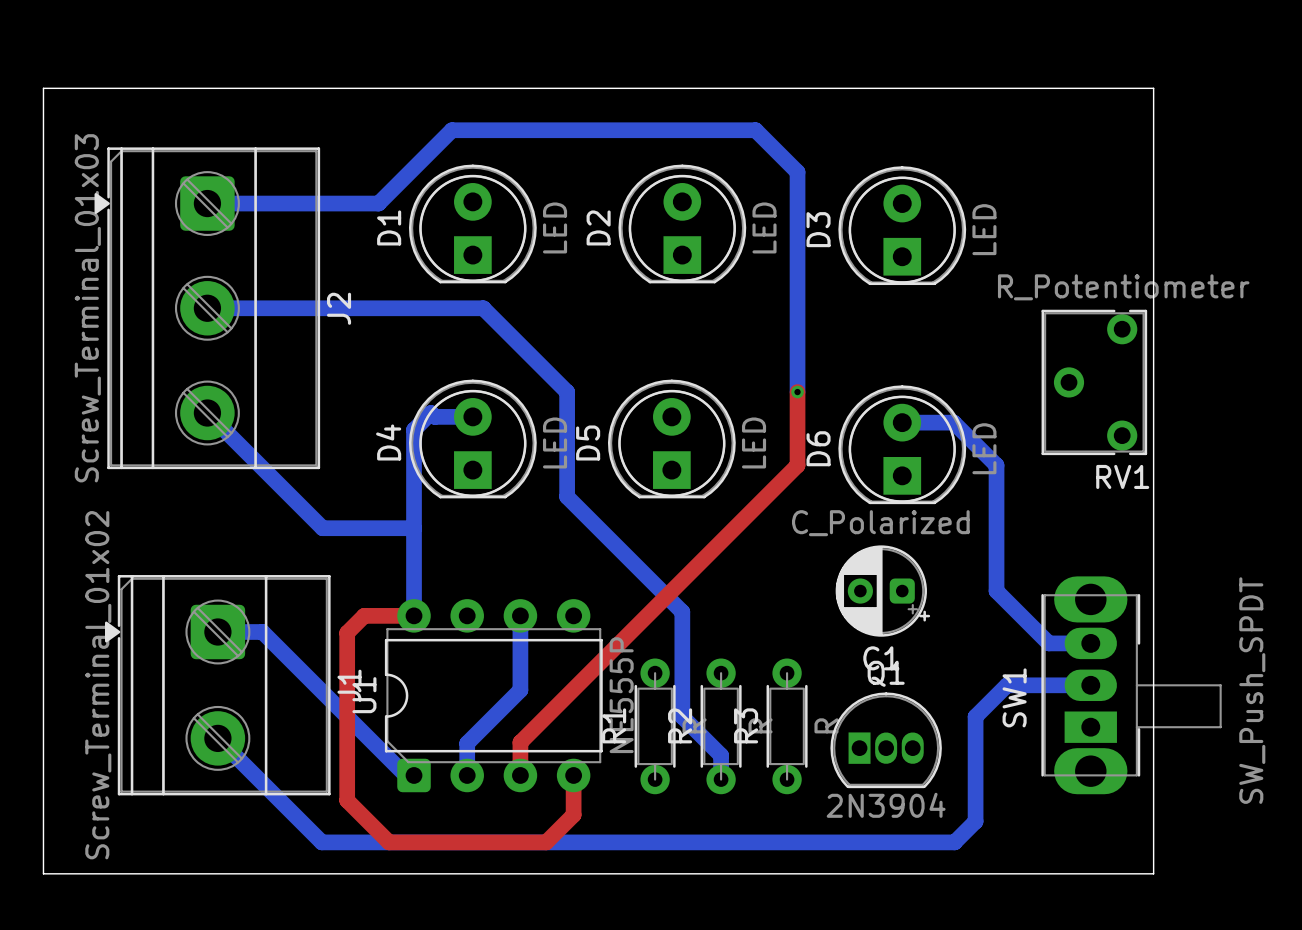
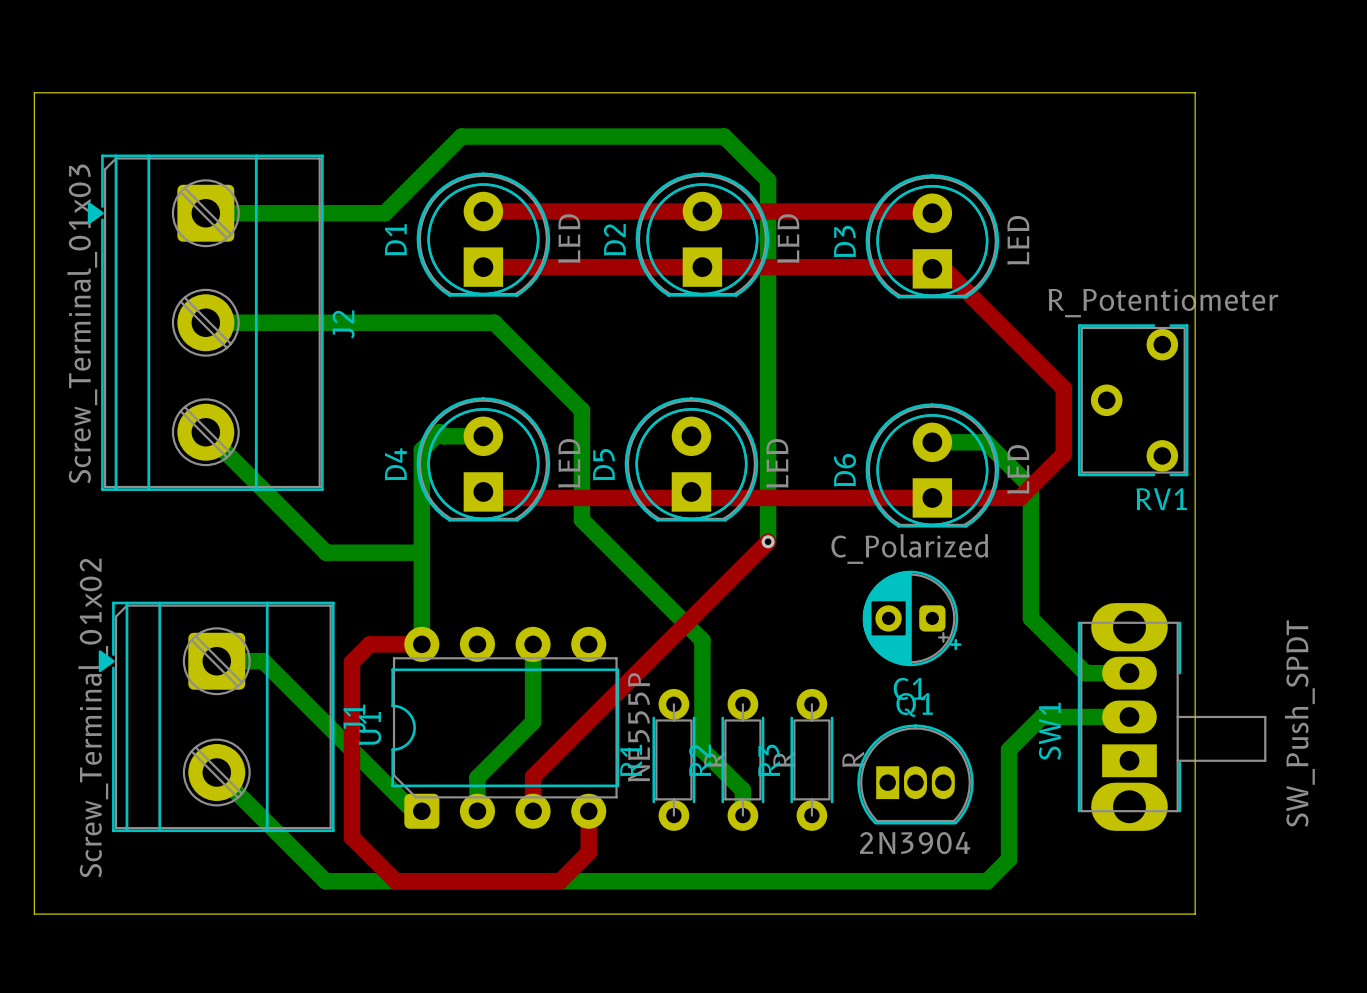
bottom track: (703, 130) (755, 130) (797, 172) (797, 392) -> (724, 136) (768, 180) (768, 541)
top track: none -> (483, 211) (930, 211) (932, 213)
top track: none -> (483, 267) (930, 267) (932, 268) (944, 268) (1063, 388) (1063, 454) (1019, 497) (489, 497) (483, 491)
top track: (797, 392) (797, 465) (745, 517) -> none
via: (797, 392) -> none
via: none -> (768, 541)

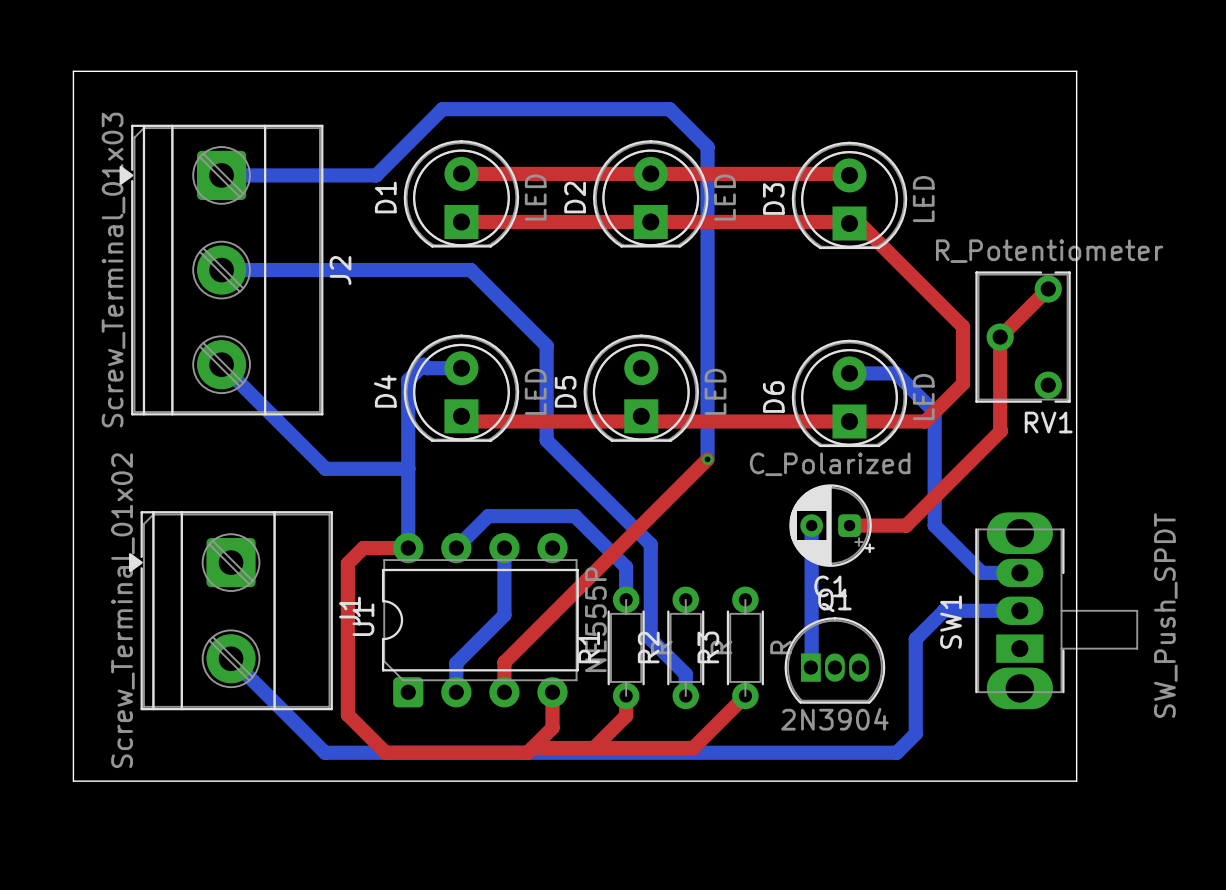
top track: none -> (1048, 289) (1000, 337) (1000, 430) (906, 525) (849, 525)
bottom track: none -> (811, 525) (810, 667)
bottom track: none -> (456, 548) (488, 516) (575, 516) (626, 567) (626, 599)
bottom track: (216, 661) (263, 661) (413, 811) -> none
top track: none -> (626, 695) (626, 715) (593, 748)
top track: none -> (745, 695) (693, 748) (532, 748)

